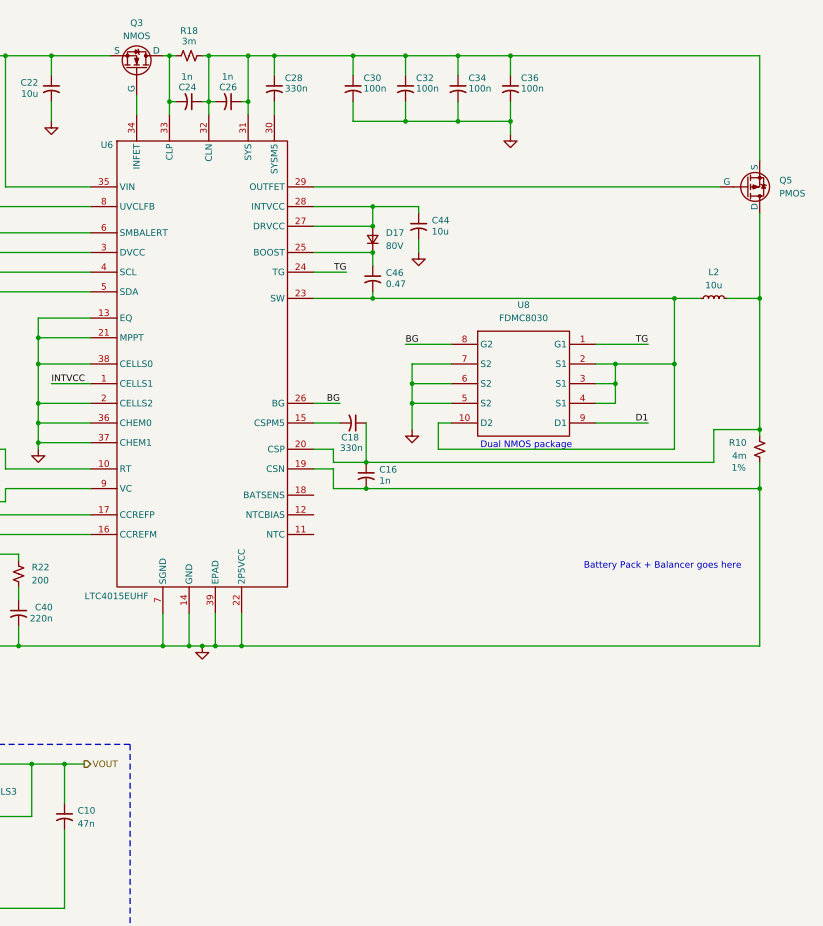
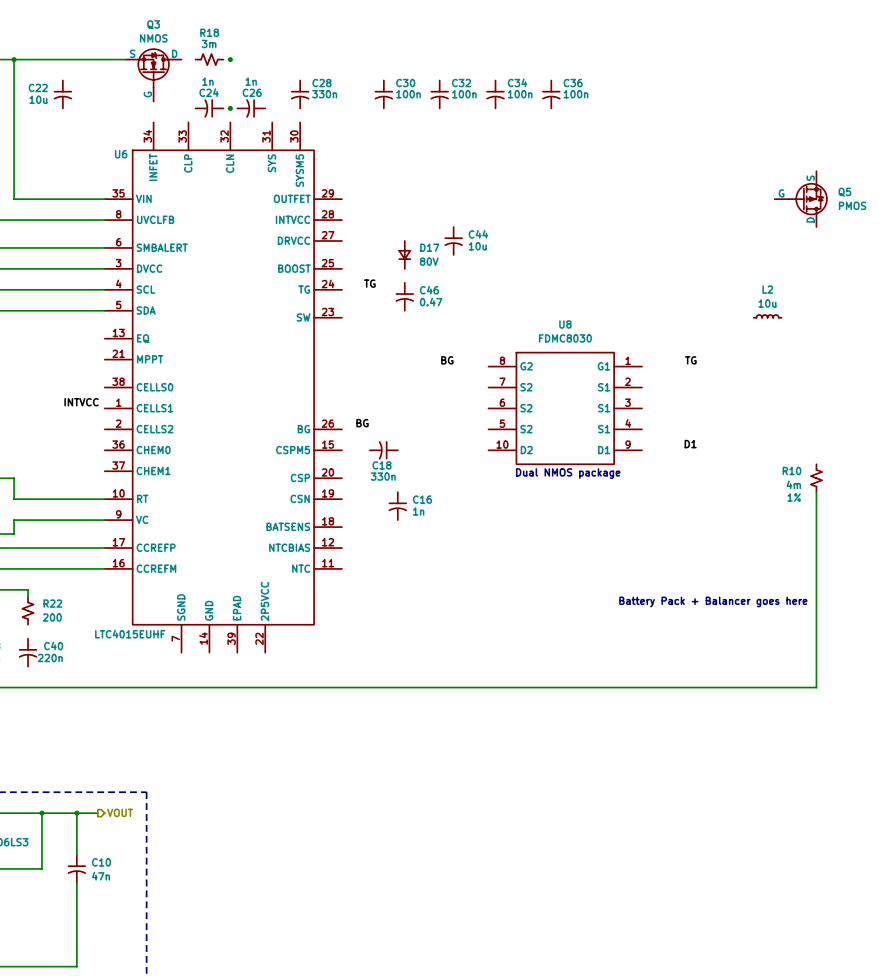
wire: (51, 55) (51, 75) -> none
junction: (51, 55) -> none
wire: (162, 55) (176, 55) -> none
wire: (169, 55) (169, 114) -> none
junction: (169, 55) -> none
wire: (202, 55) (759, 55) (759, 160) -> none
wire: (208, 55) (208, 114) -> none
wire: (248, 55) (248, 114) -> none
junction: (248, 55) -> none
wire: (274, 55) (274, 75) -> none
junction: (274, 55) -> none
wire: (353, 55) (353, 75) -> none
junction: (353, 55) -> none
wire: (405, 55) (405, 75) -> none
junction: (405, 55) -> none
wire: (458, 55) (458, 75) -> none
junction: (458, 55) -> none
wire: (510, 55) (510, 75) -> none
junction: (510, 55) -> none
wire: (136, 95) (136, 114) -> none
wire: (51, 101) (51, 121) -> none
wire: (169, 101) (176, 101) -> none
junction: (169, 101) -> none
wire: (202, 101) (215, 101) -> none
wire: (241, 101) (248, 101) -> none
junction: (248, 101) -> none
wire: (274, 101) (274, 114) -> none
wire: (353, 101) (353, 121) (510, 121) -> none
wire: (405, 101) (405, 121) -> none
wire: (458, 101) (458, 121) -> none
wire: (510, 101) (510, 134) -> none
junction: (405, 121) -> none
junction: (458, 121) -> none
junction: (510, 121) -> none
power symbol: (51, 127) -> none
power symbol: (510, 141) -> none
wire: (313, 186) (720, 186) -> none
wire: (313, 206) (418, 206) (418, 213) -> none
wire: (372, 206) (372, 226) (313, 226) -> none
junction: (372, 206) -> none
wire: (759, 213) (759, 436) -> none
junction: (372, 226) -> none
wire: (418, 239) (418, 252) -> none
wire: (313, 252) (372, 252) (372, 265) -> none
junction: (372, 252) -> none
power symbol: (418, 259) -> none
wire: (313, 272) (346, 272) -> none
wire: (372, 291) (372, 298) -> none
wire: (313, 298) (700, 298) -> none
junction: (372, 298) -> none
wire: (674, 298) (674, 449) (438, 449) (438, 423) (451, 423) -> none
junction: (674, 298) -> none
wire: (726, 298) (759, 298) -> none
junction: (759, 298) -> none
wire: (90, 318) (38, 318) (38, 449) -> none
wire: (38, 337) (90, 337) -> none
junction: (38, 337) -> none
wire: (405, 344) (451, 344) -> none
wire: (595, 344) (648, 344) -> none
wire: (38, 363) (90, 363) -> none
junction: (38, 363) -> none
wire: (451, 363) (412, 363) (412, 429) -> none
wire: (595, 363) (674, 363) -> none
wire: (615, 363) (615, 403) (595, 403) -> none
junction: (615, 363) -> none
junction: (674, 363) -> none
wire: (51, 383) (90, 383) -> none
wire: (412, 383) (451, 383) -> none
junction: (412, 383) -> none
wire: (595, 383) (615, 383) -> none
junction: (615, 383) -> none
wire: (38, 403) (90, 403) -> none
junction: (38, 403) -> none
wire: (313, 403) (339, 403) -> none
wire: (412, 403) (451, 403) -> none
junction: (412, 403) -> none
wire: (38, 423) (90, 423) -> none
junction: (38, 423) -> none
wire: (313, 423) (339, 423) -> none
wire: (366, 423) (366, 462) -> none
wire: (595, 423) (648, 423) -> none
wire: (759, 429) (713, 429) (713, 462) (333, 462) (333, 449) (313, 449) -> none
junction: (759, 429) -> none
power symbol: (412, 436) -> none
wire: (38, 442) (90, 442) -> none
junction: (38, 442) -> none
power symbol: (38, 455) -> none
junction: (366, 462) -> none
wire: (313, 468) (333, 468) (333, 488) (759, 488) -> none
junction: (366, 488) -> none
junction: (759, 488) -> none
wire: (18, 586) (18, 600) -> none
wire: (162, 613) (162, 645) -> none
wire: (189, 613) (189, 645) -> none
wire: (215, 613) (215, 645) -> none
wire: (241, 613) (241, 645) -> none
wire: (18, 626) (18, 645) -> none
junction: (18, 645) -> none
junction: (162, 645) -> none
junction: (189, 645) -> none
junction: (202, 645) -> none
junction: (215, 645) -> none
junction: (241, 645) -> none
power symbol: (202, 652) -> none

